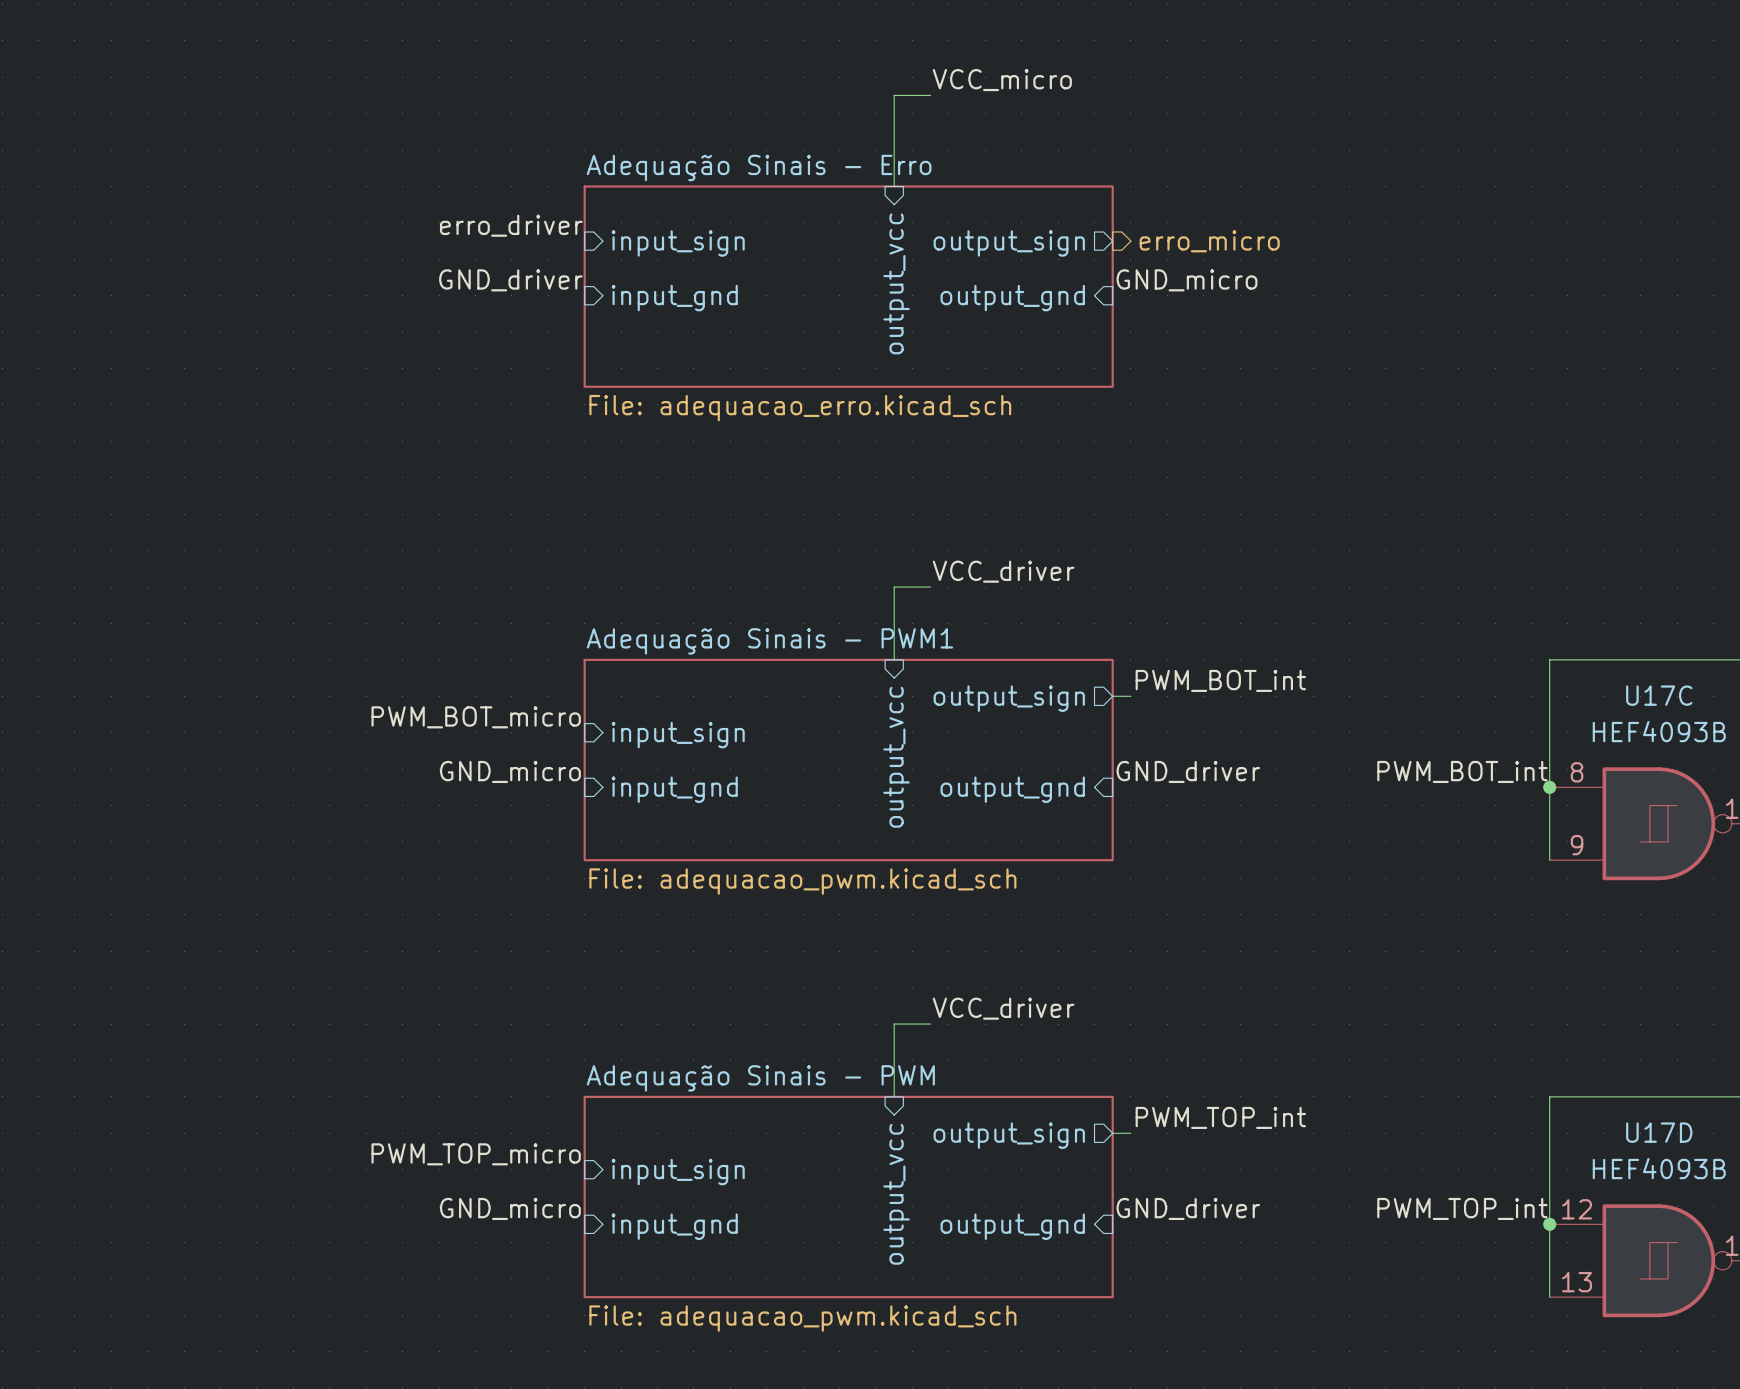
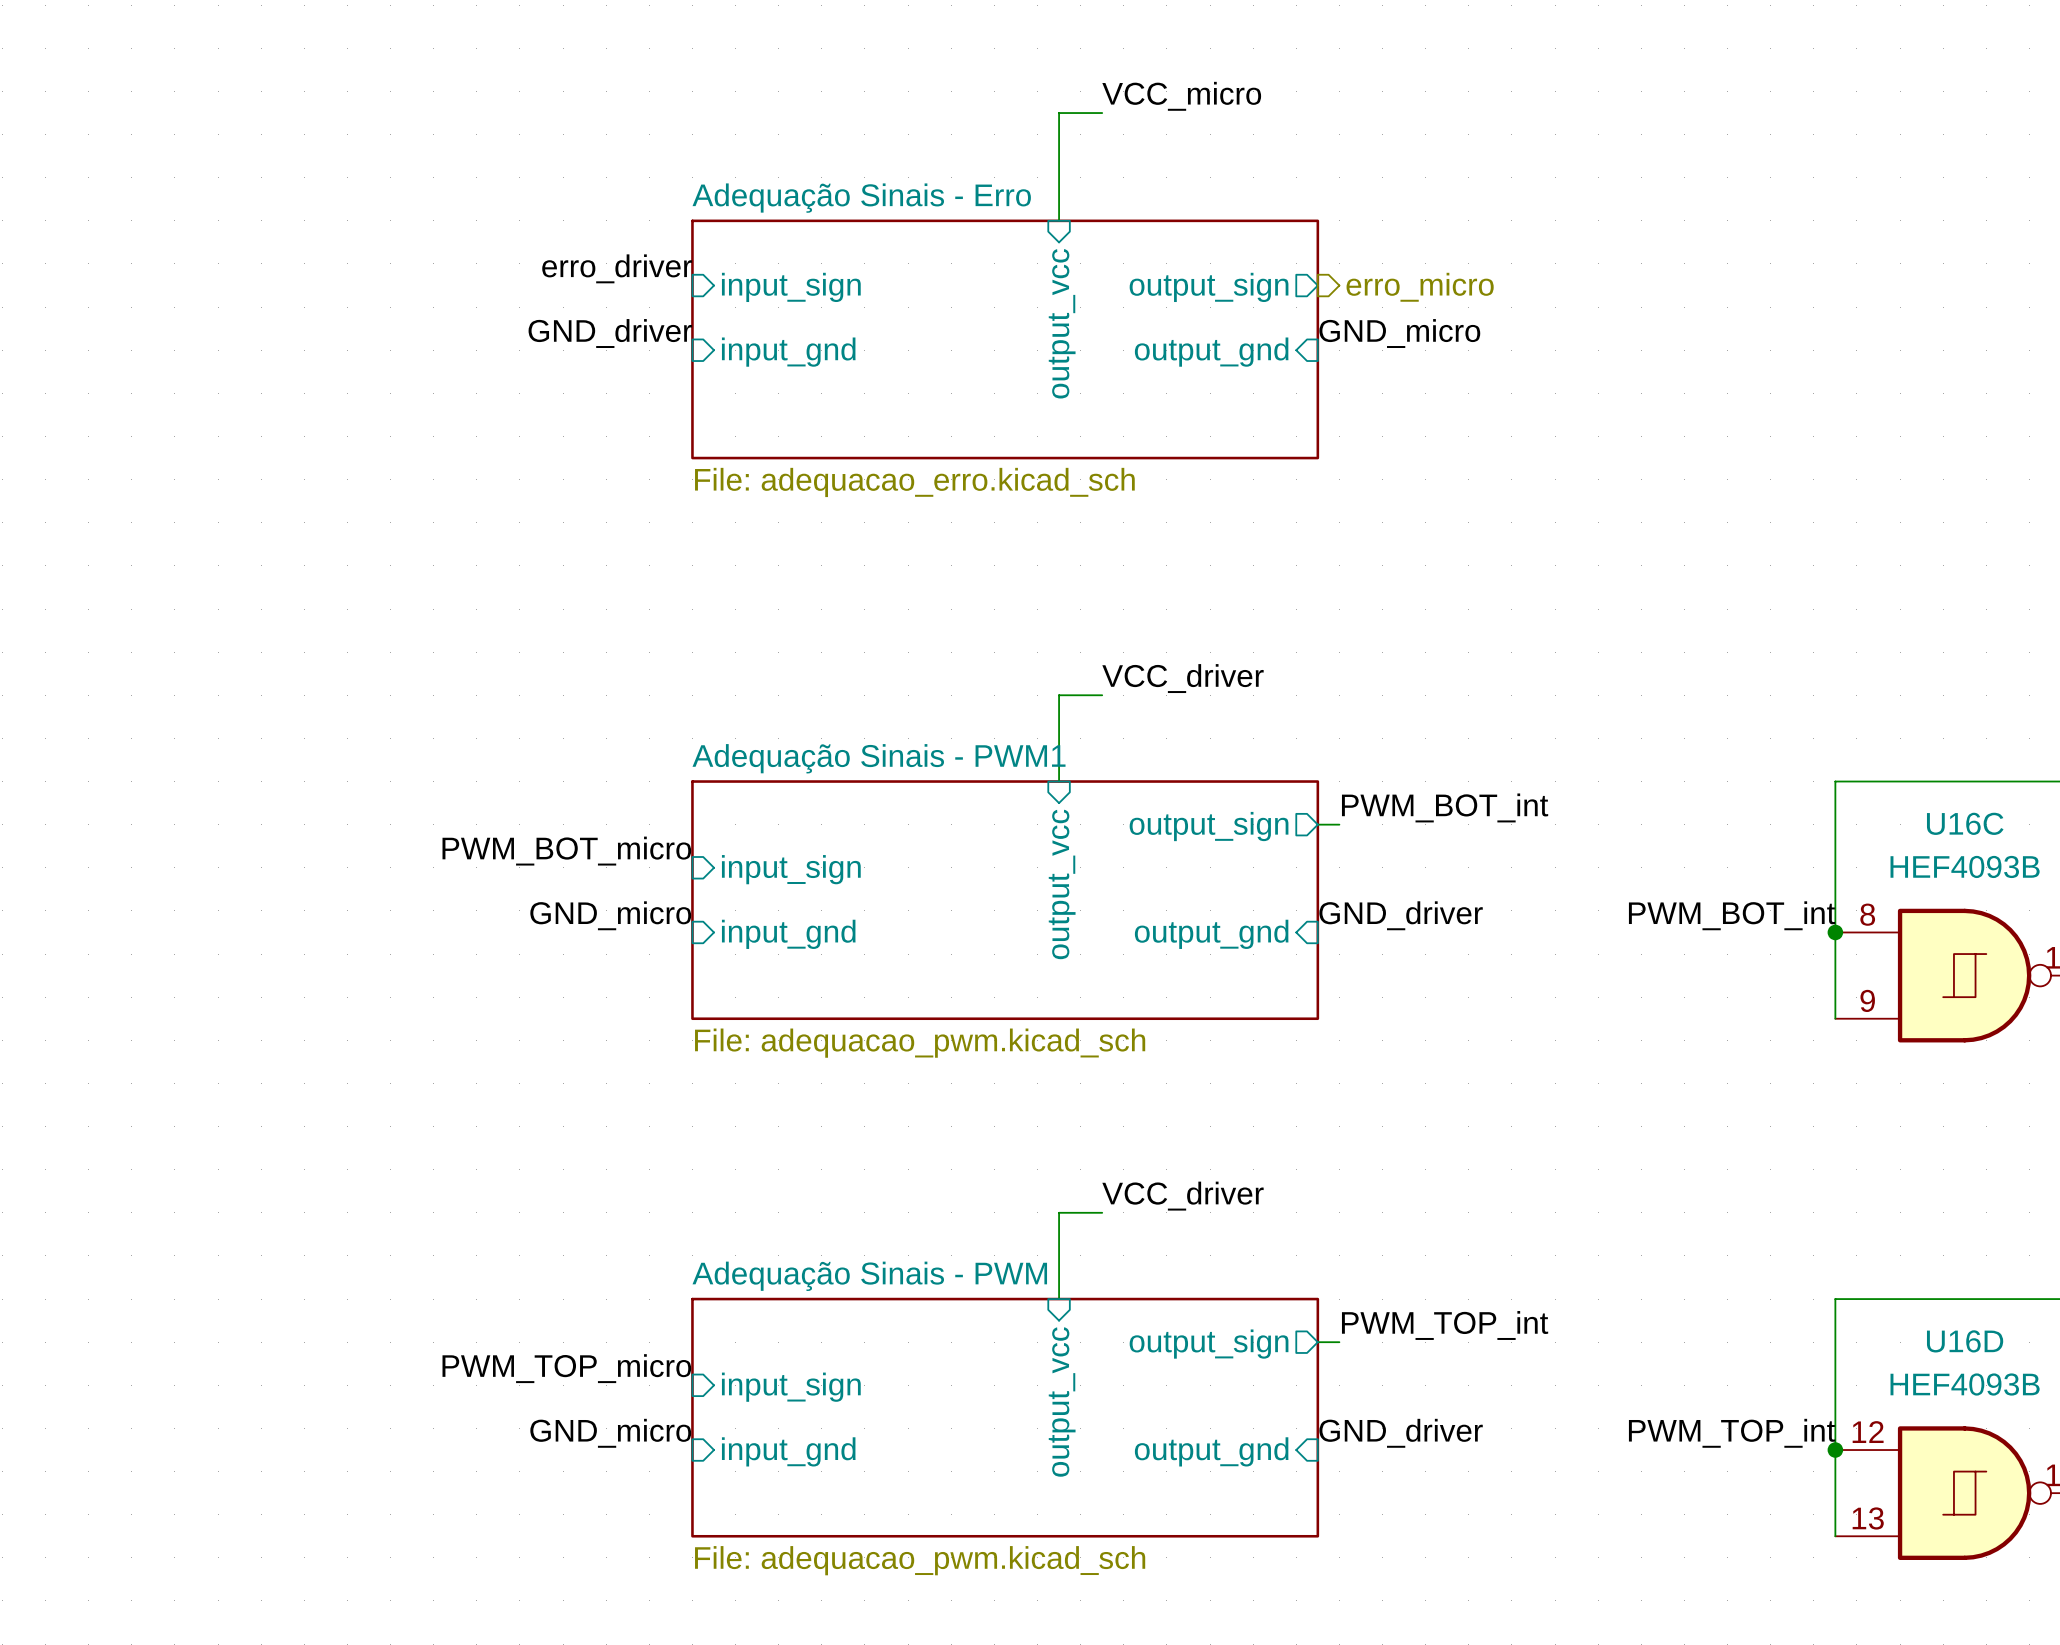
U17C name: U17C (1659, 695) -> U16C (1965, 823)
U17D name: U17D (1659, 1132) -> U16D (1965, 1341)

